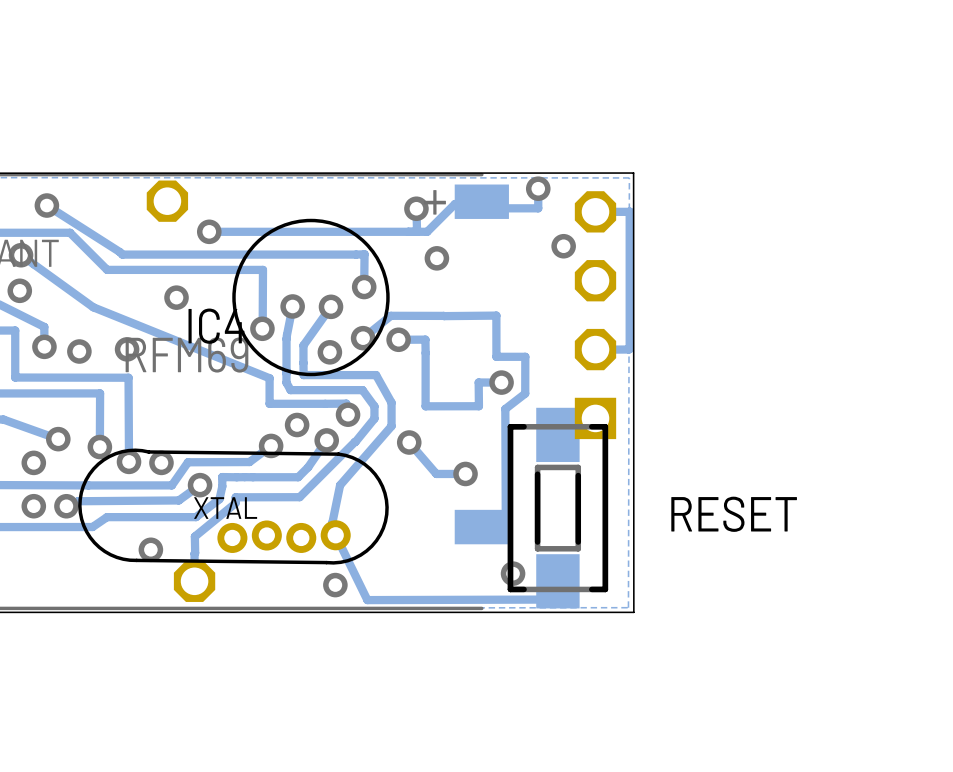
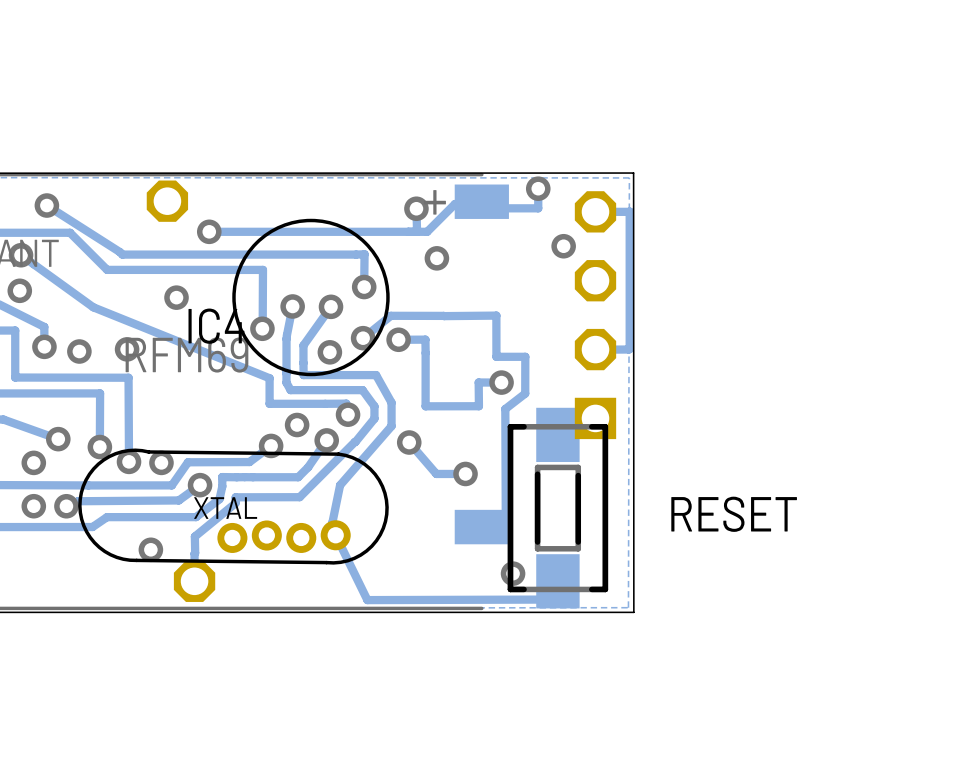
via: (335, 585) -> none

